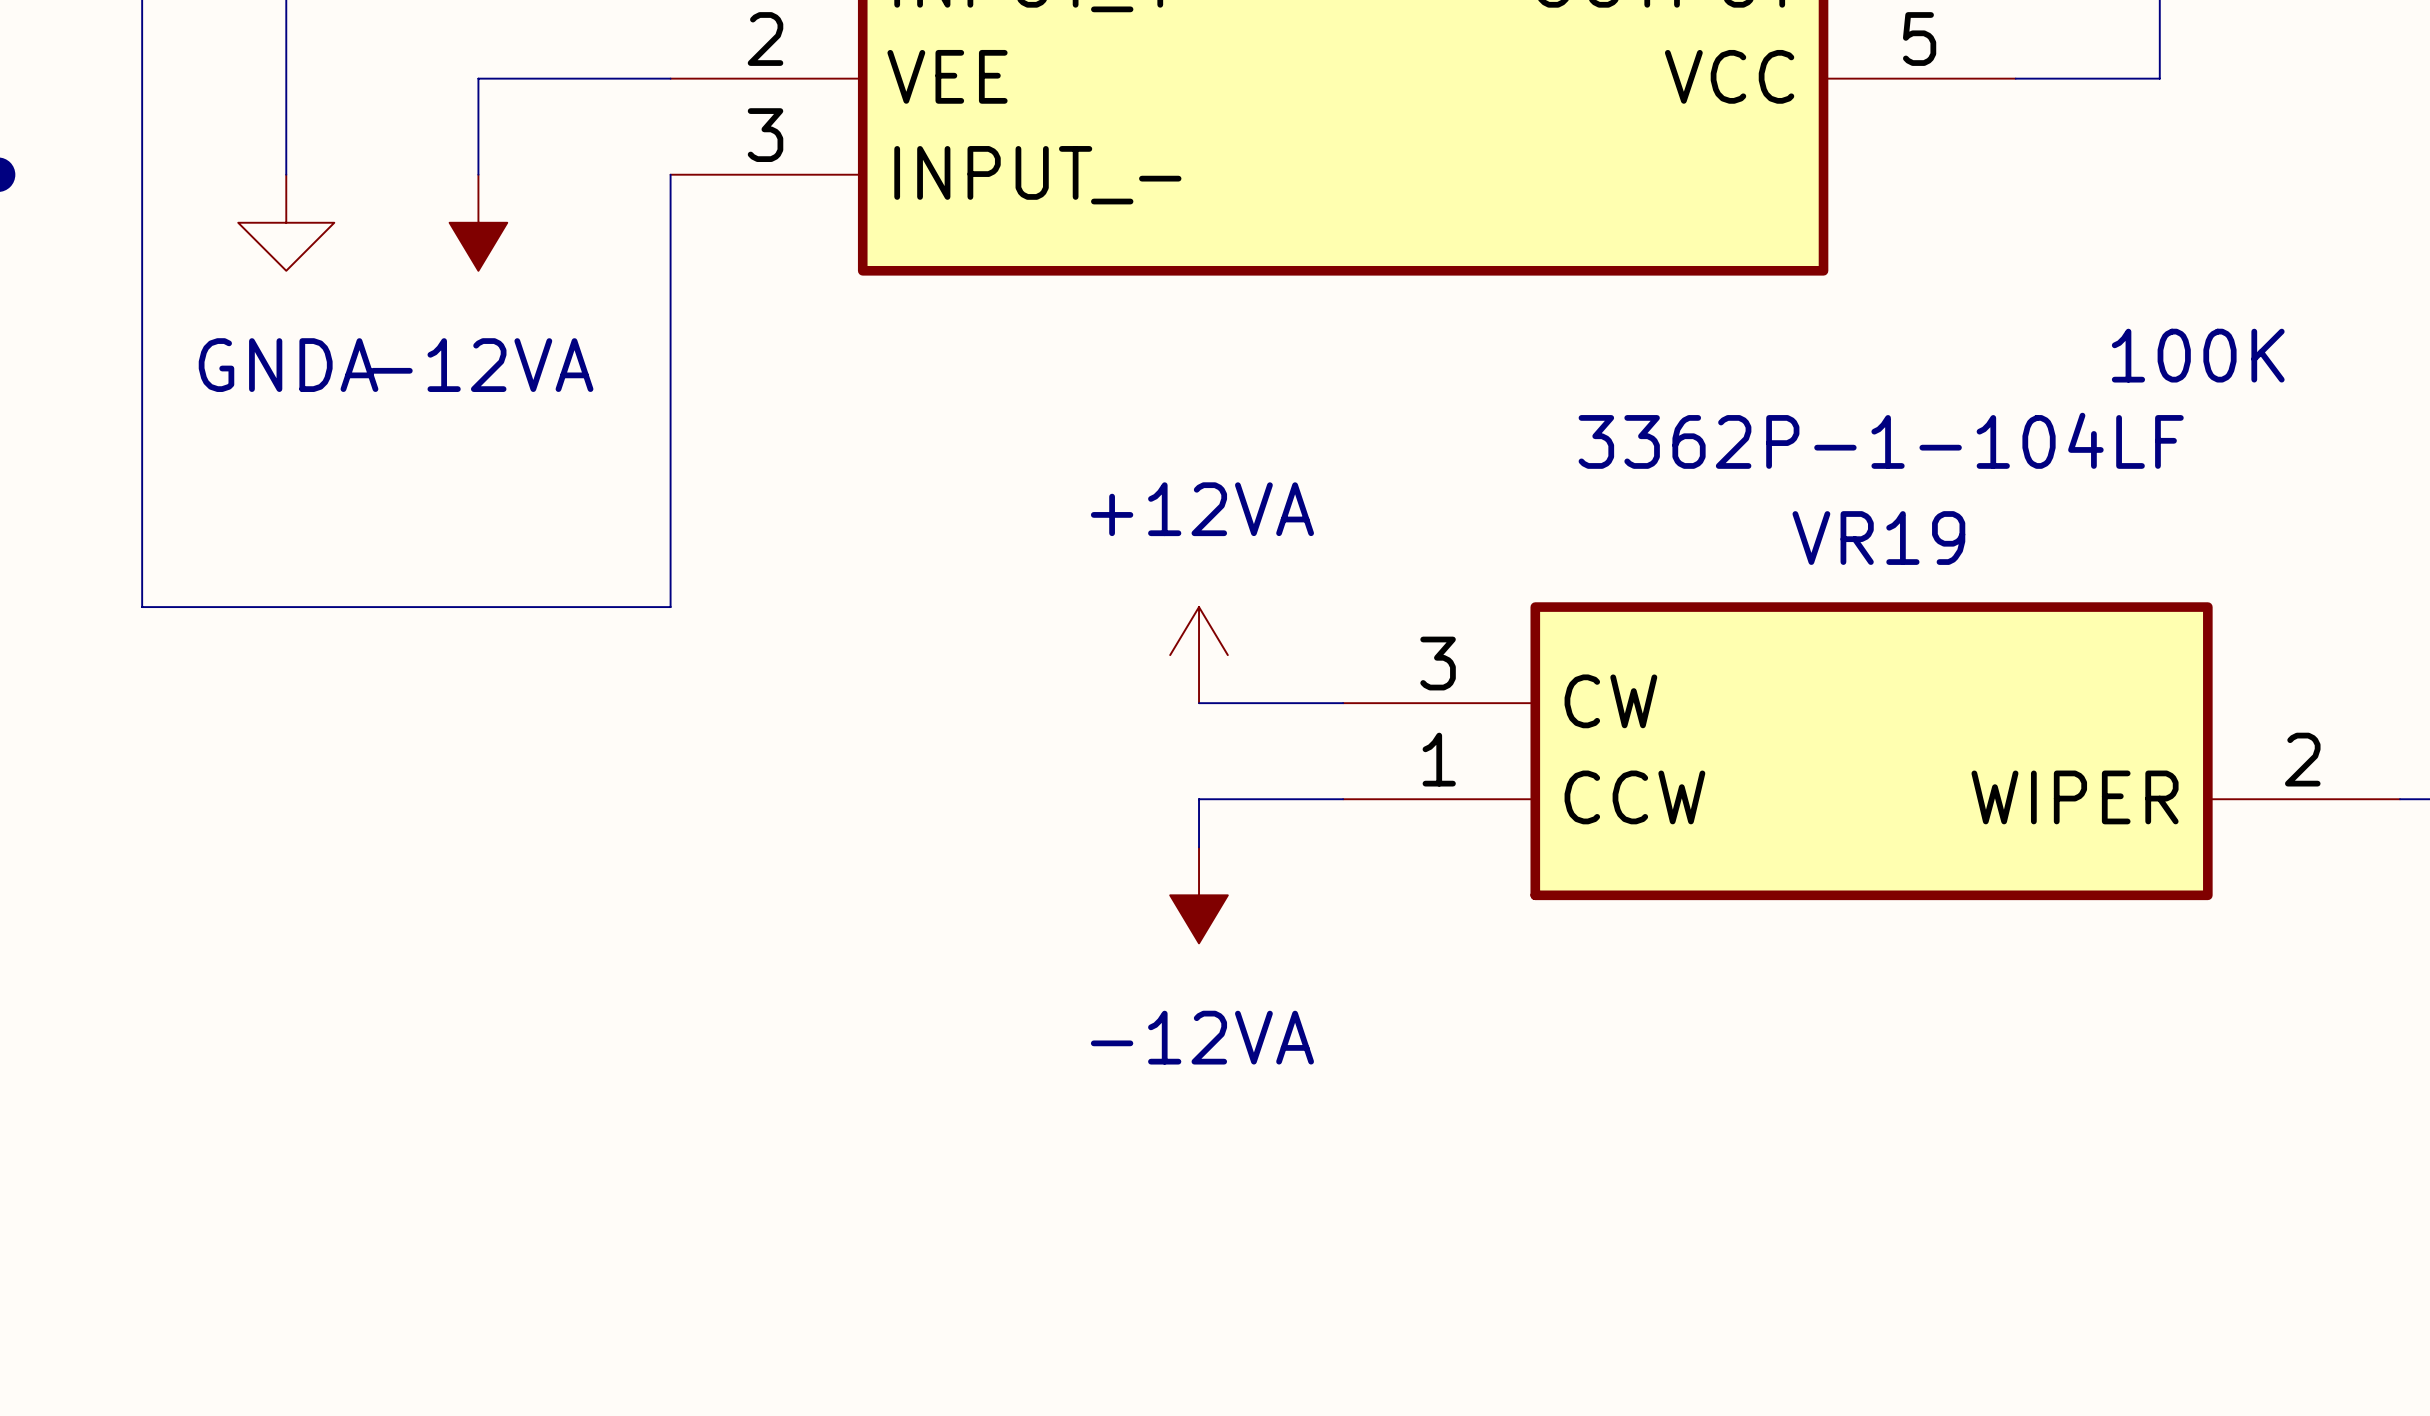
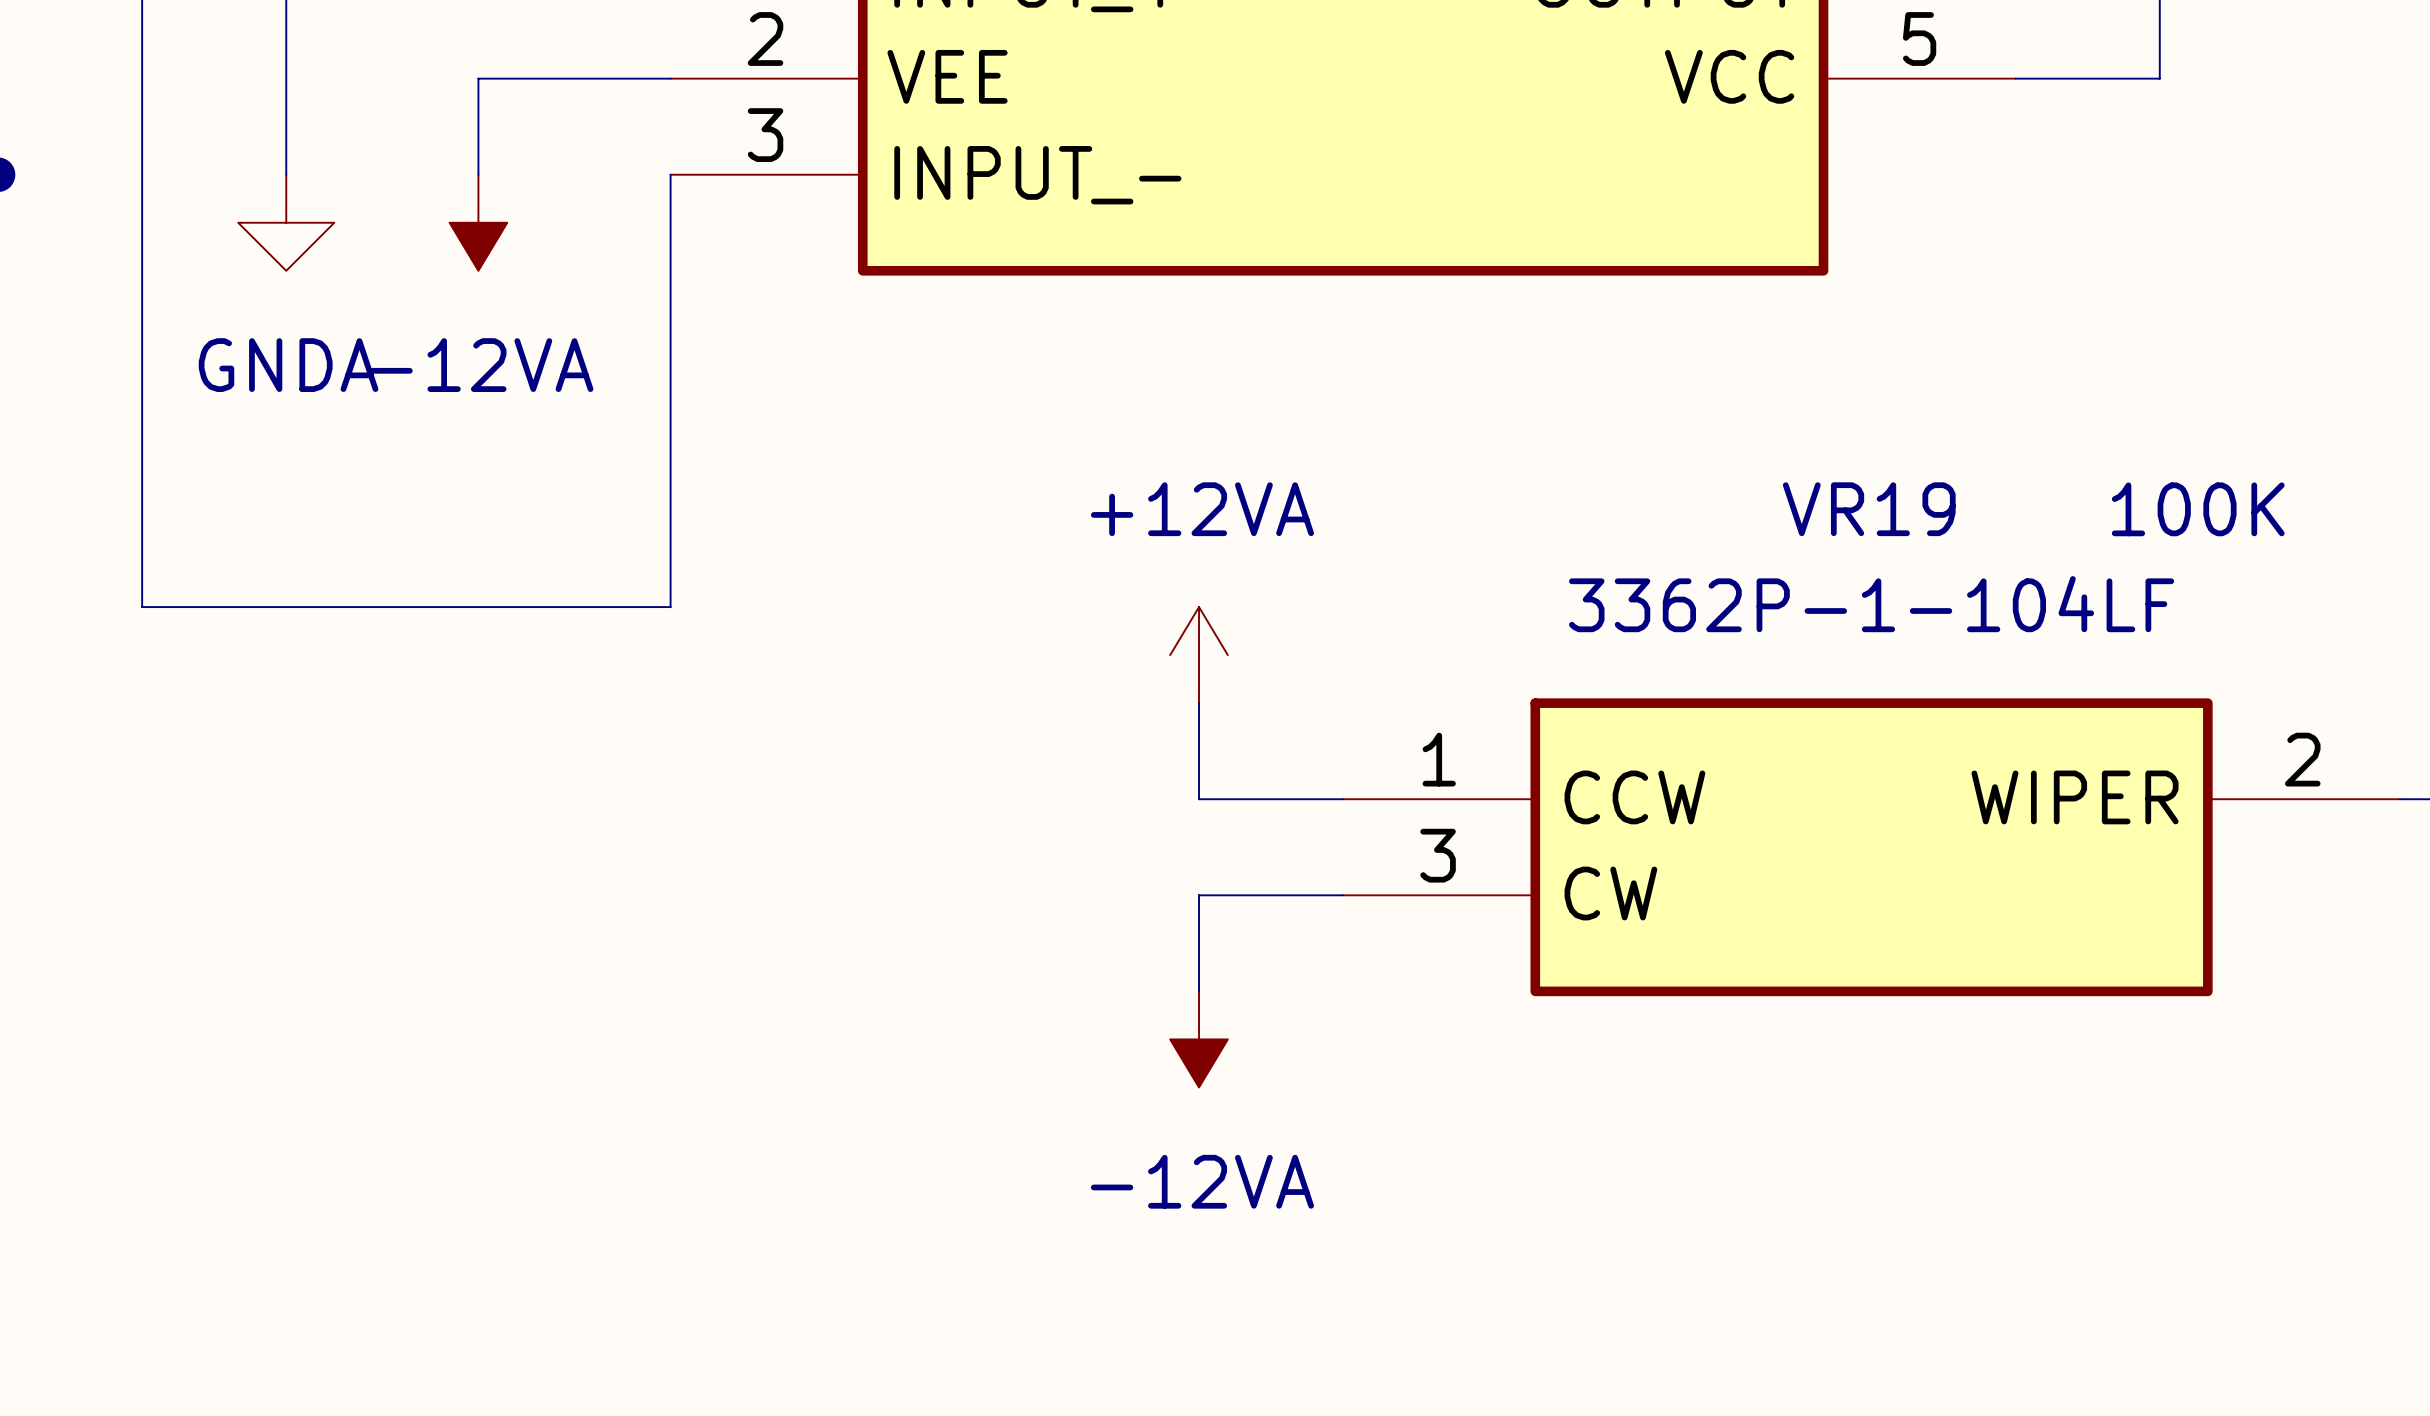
text position: 100K (2198, 355) -> 100K (2198, 509)
VR19 name position: VR19 (1878, 538) -> VR19 (1869, 509)
wire: (1199, 703) (1343, 703) -> none
VR19 flip: as is (1871, 751) -> up-down (1871, 847)
wire: (1199, 799) (1199, 847) -> (1199, 799) (1199, 703)
power symbol position: -12VA (1199, 895) -> -12VA (1199, 1039)
wire: none -> (1343, 895) (1199, 895) (1199, 991)

